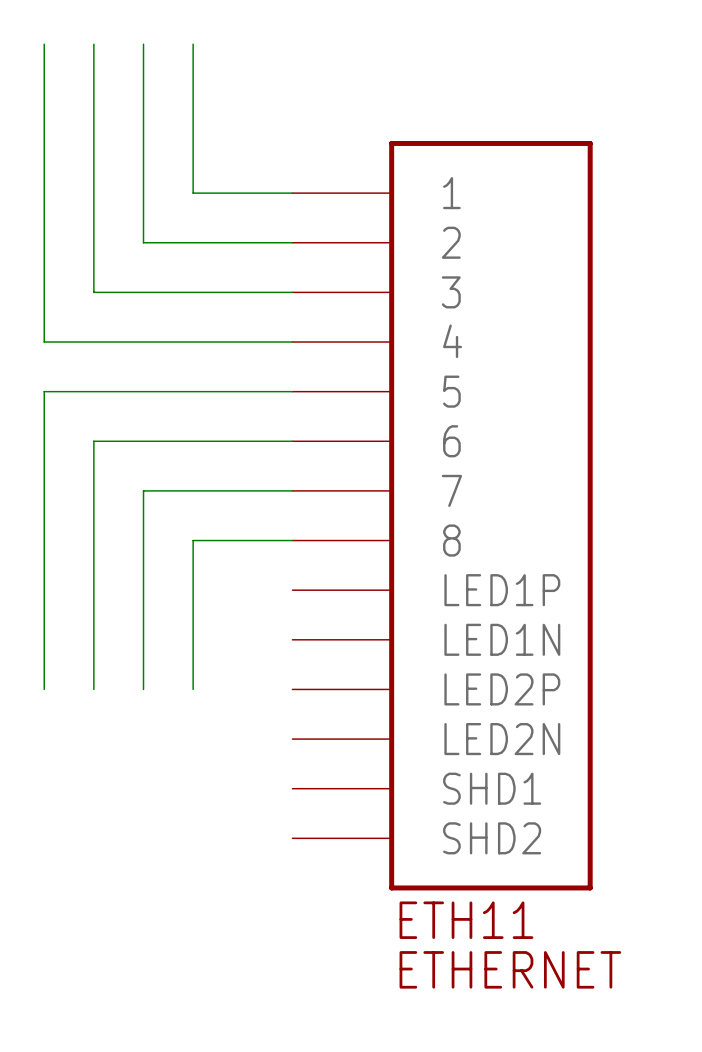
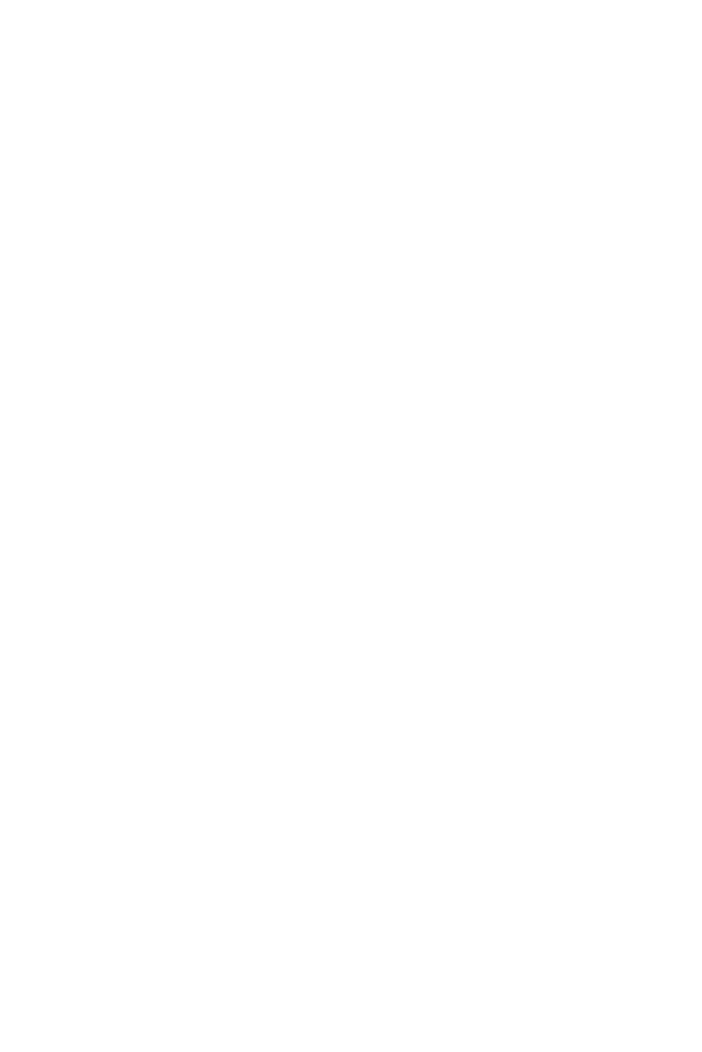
wire: (44, 44) (44, 342) (292, 342) -> none
wire: (93, 44) (93, 292) (292, 292) -> none
wire: (143, 44) (143, 242) (292, 242) -> none
wire: (193, 44) (193, 193) (292, 193) -> none
wire: (292, 391) (44, 391) (44, 689) -> none
wire: (292, 441) (93, 441) (93, 689) -> none
wire: (292, 490) (143, 490) (143, 689) -> none
ETH11: ETHERNET (442, 515) -> none
wire: (292, 540) (193, 540) (193, 689) -> none

